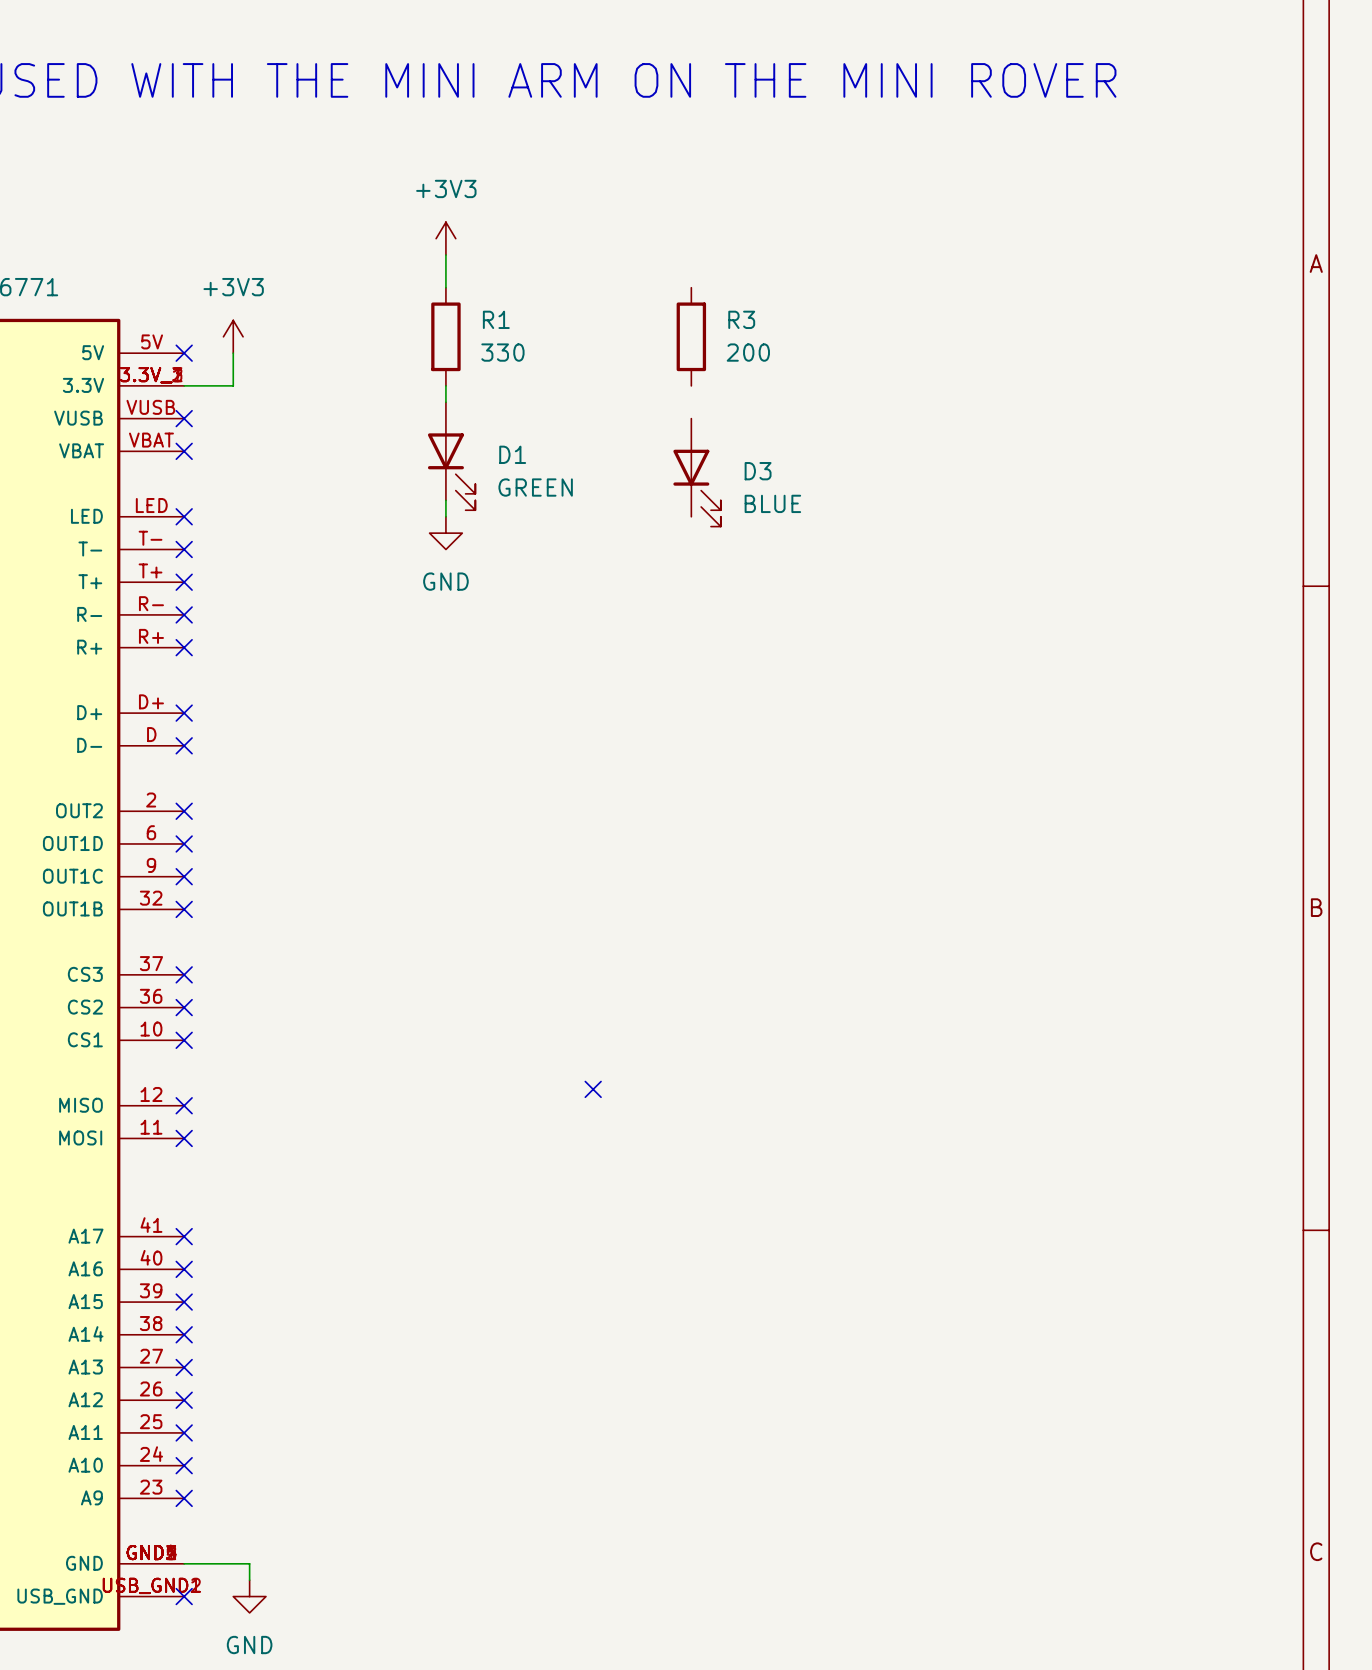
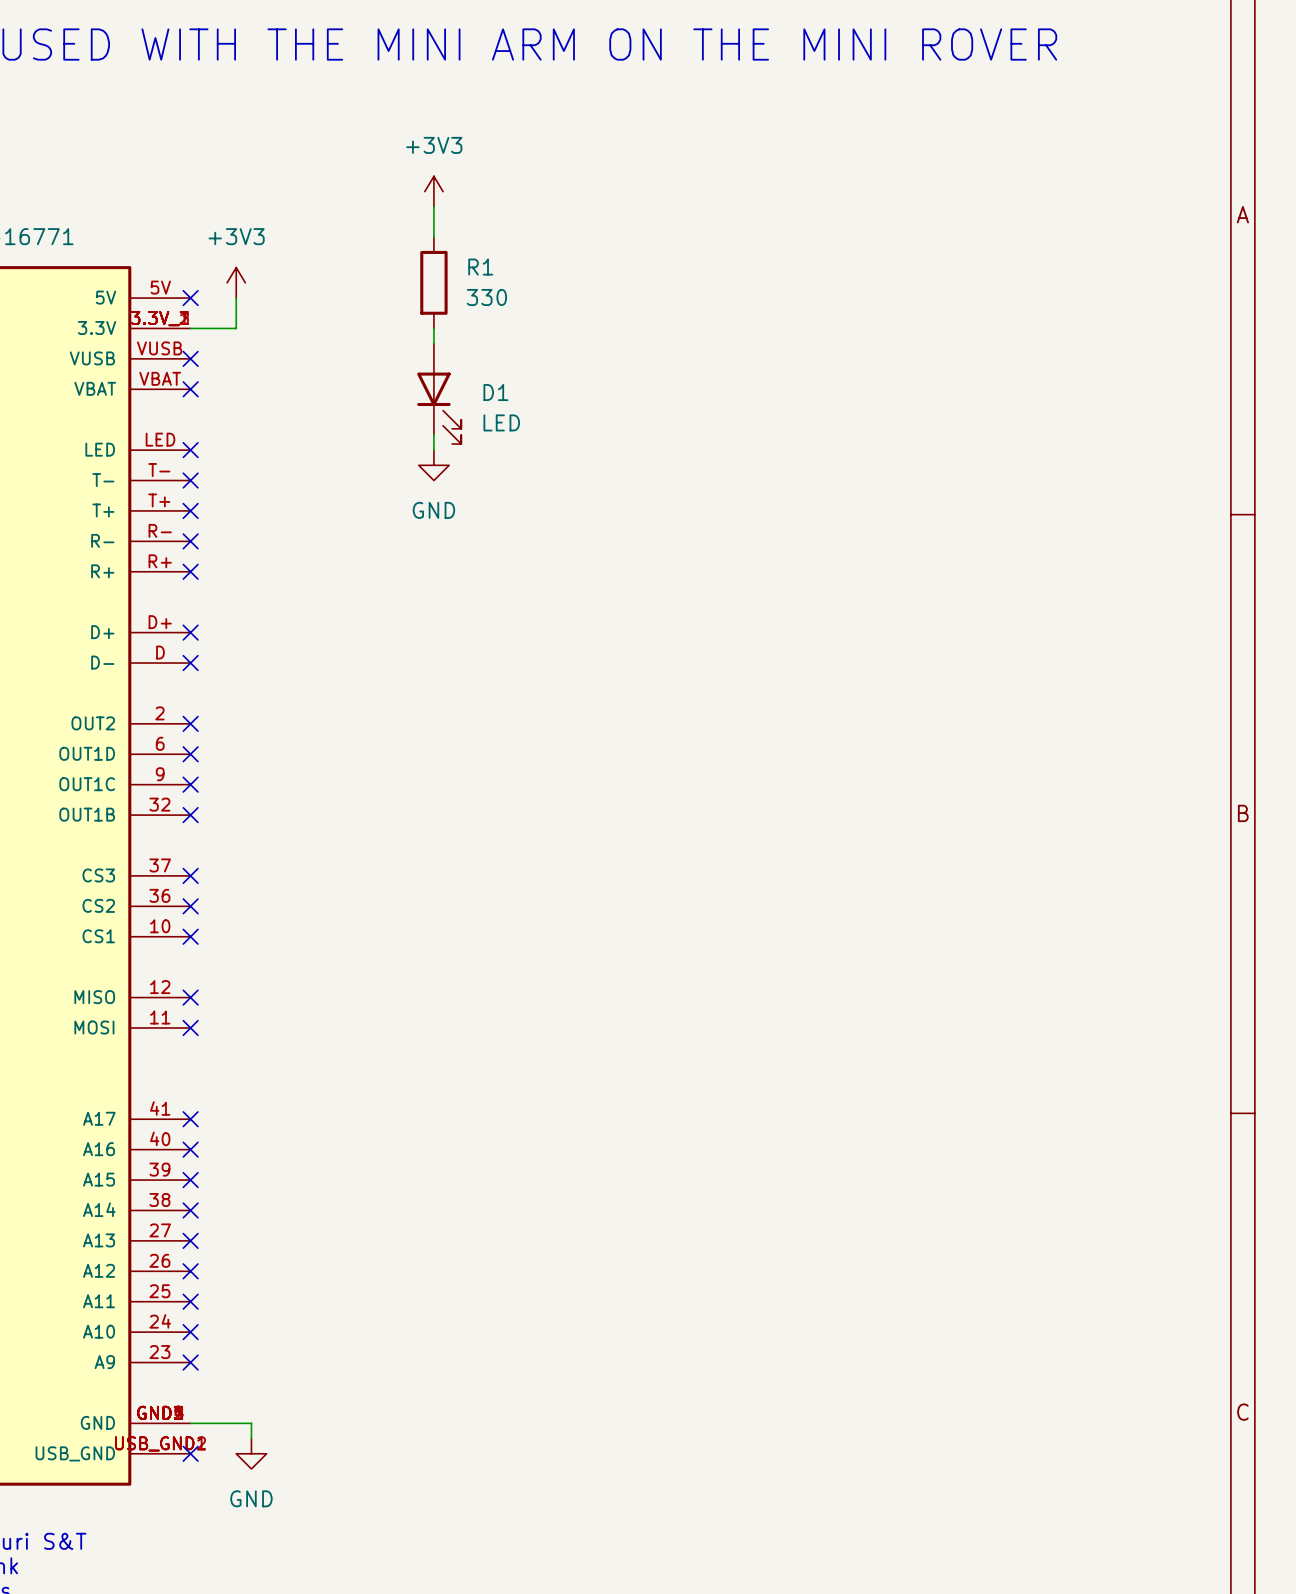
R3: 200 (691, 336) -> none
D3: BLUE (697, 472) -> none
D1 value: GREEN (535, 487) -> LED (501, 422)
no-connect mark: (593, 1089) -> none

